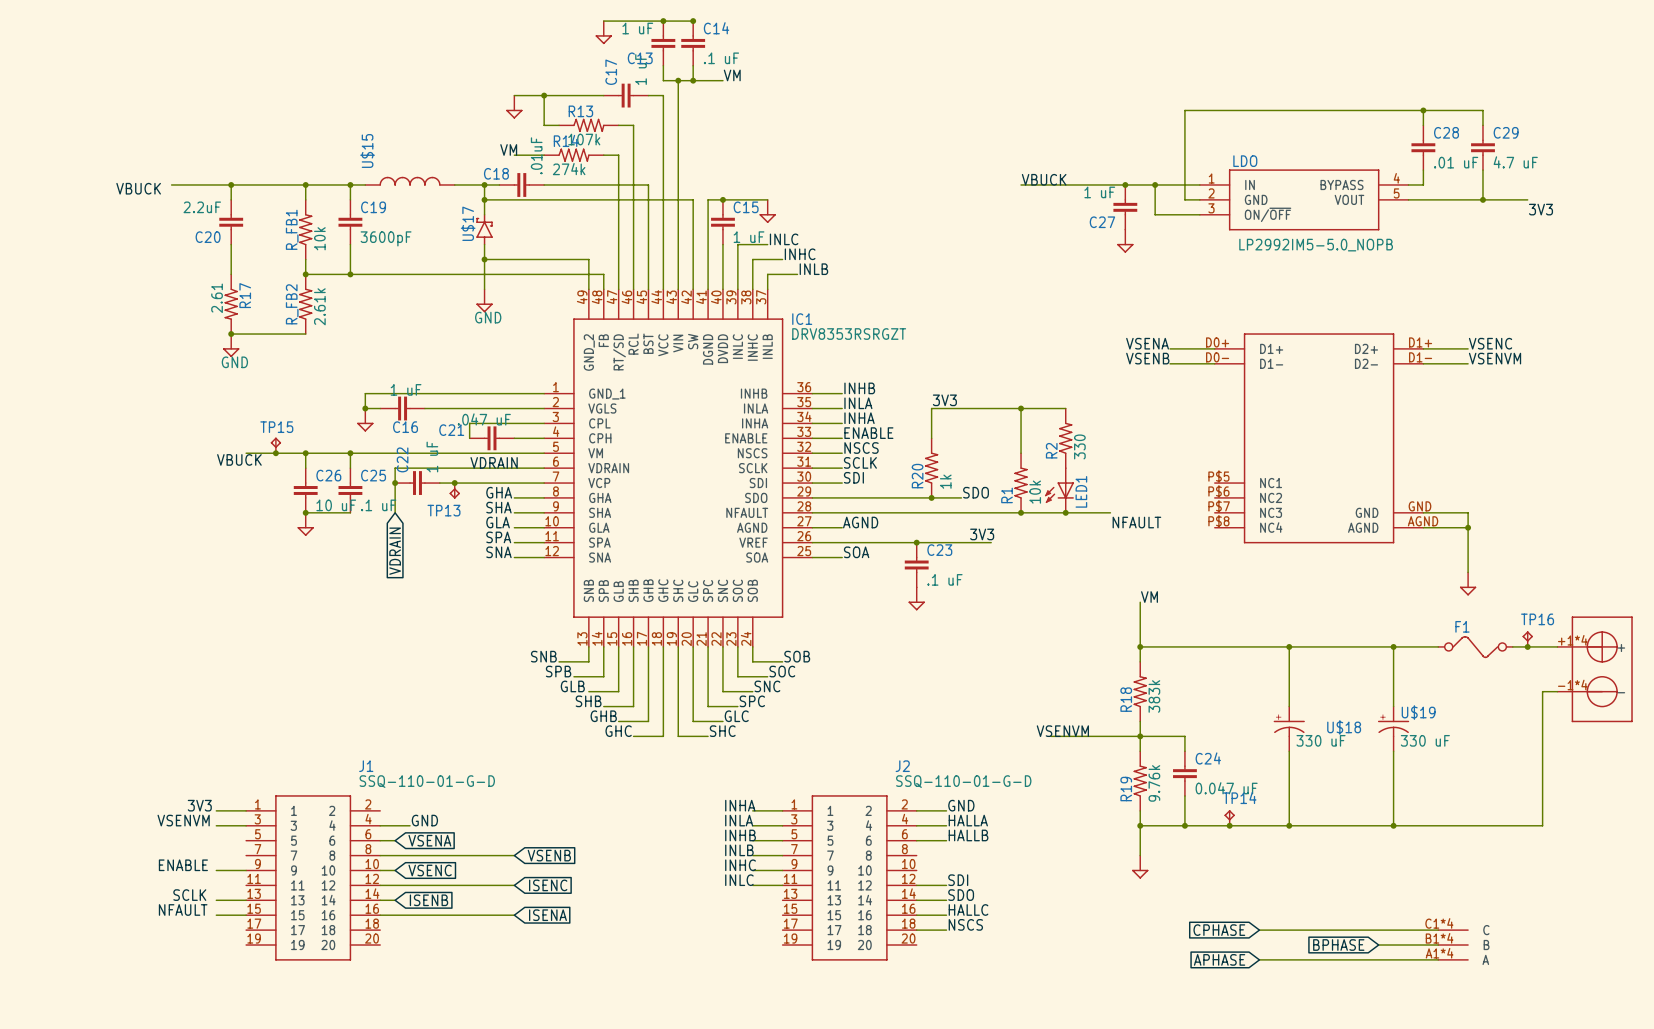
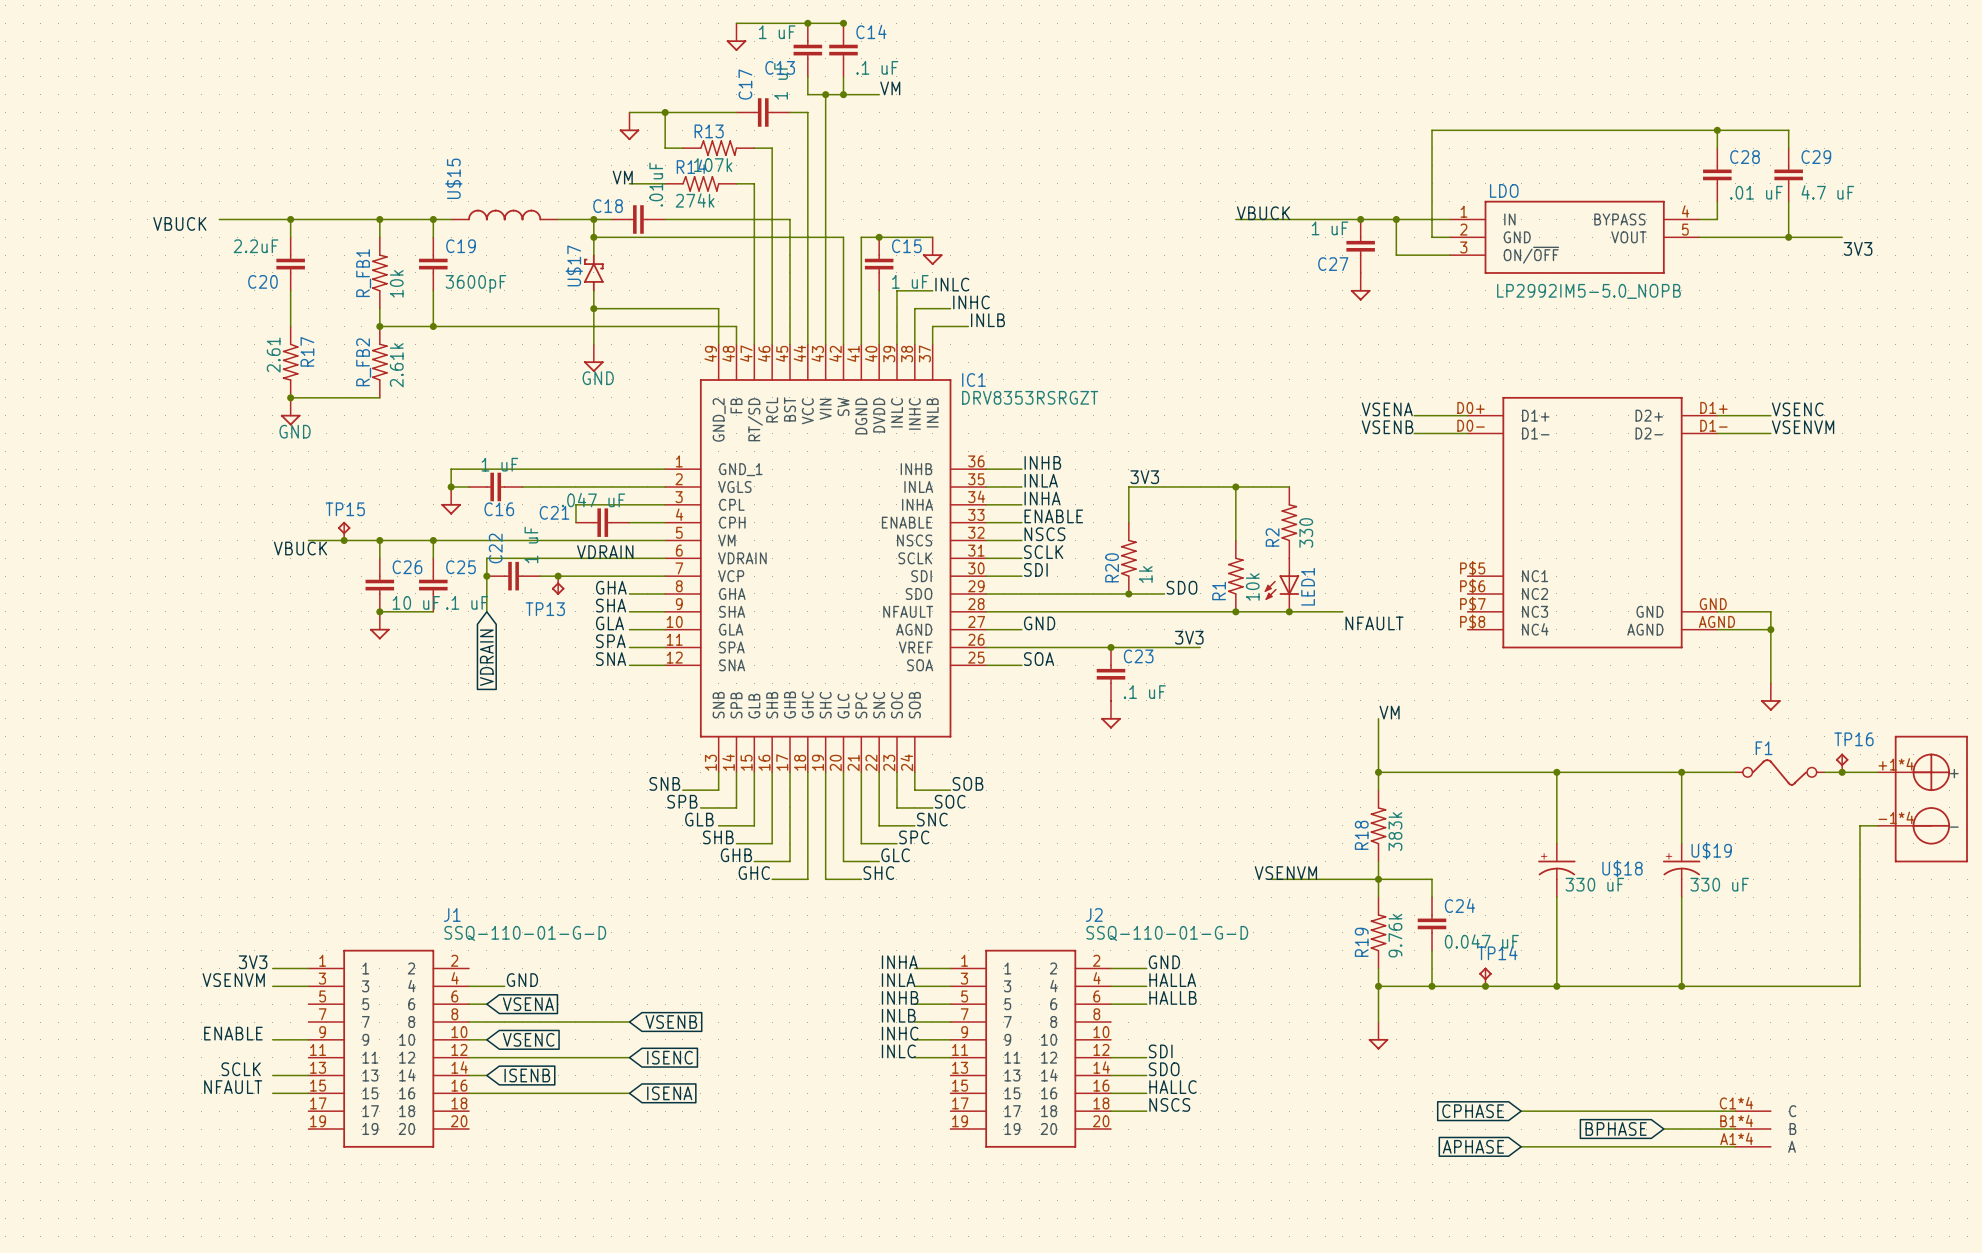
label: AGND (860, 522) -> GND (1039, 623)

